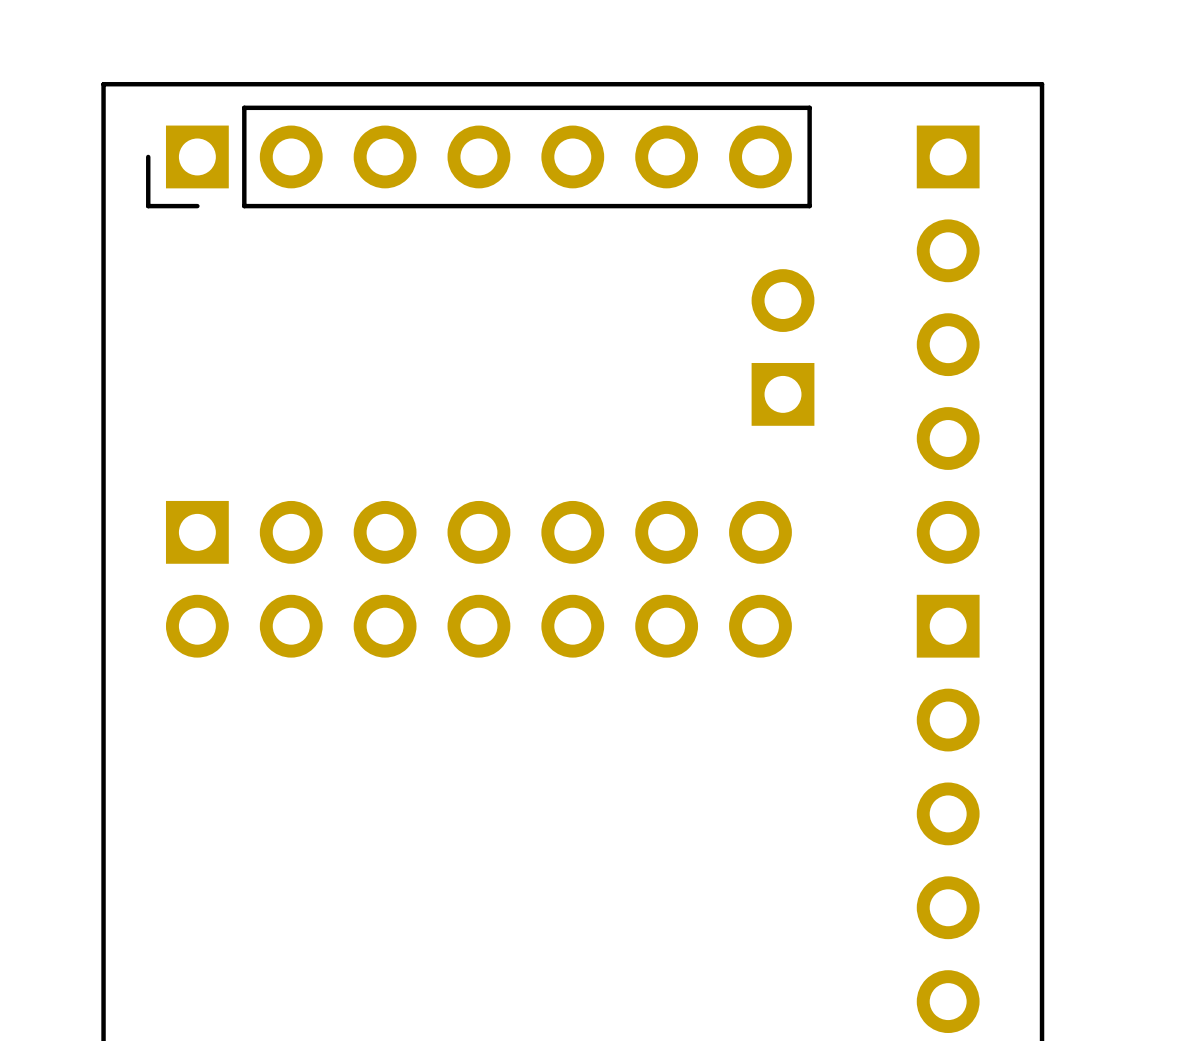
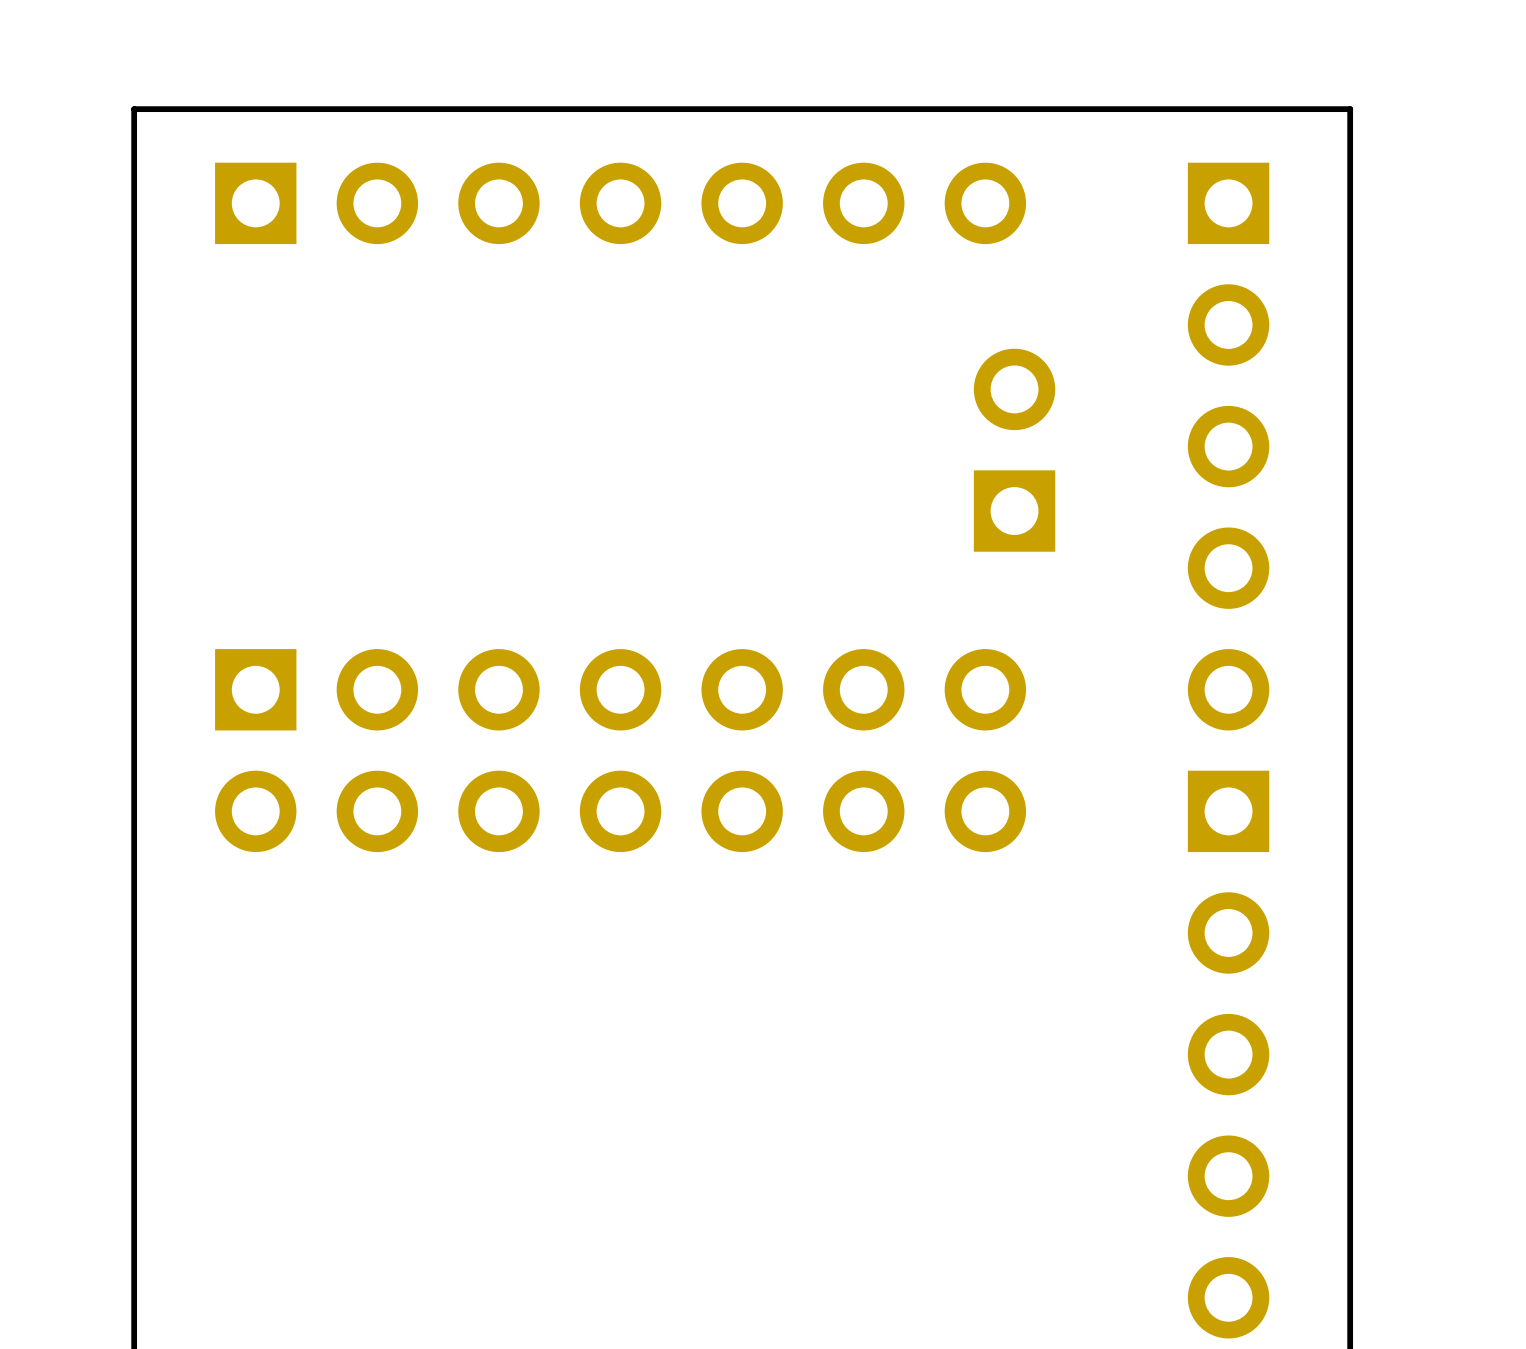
part side: bottom (478, 156) -> top (620, 203)

